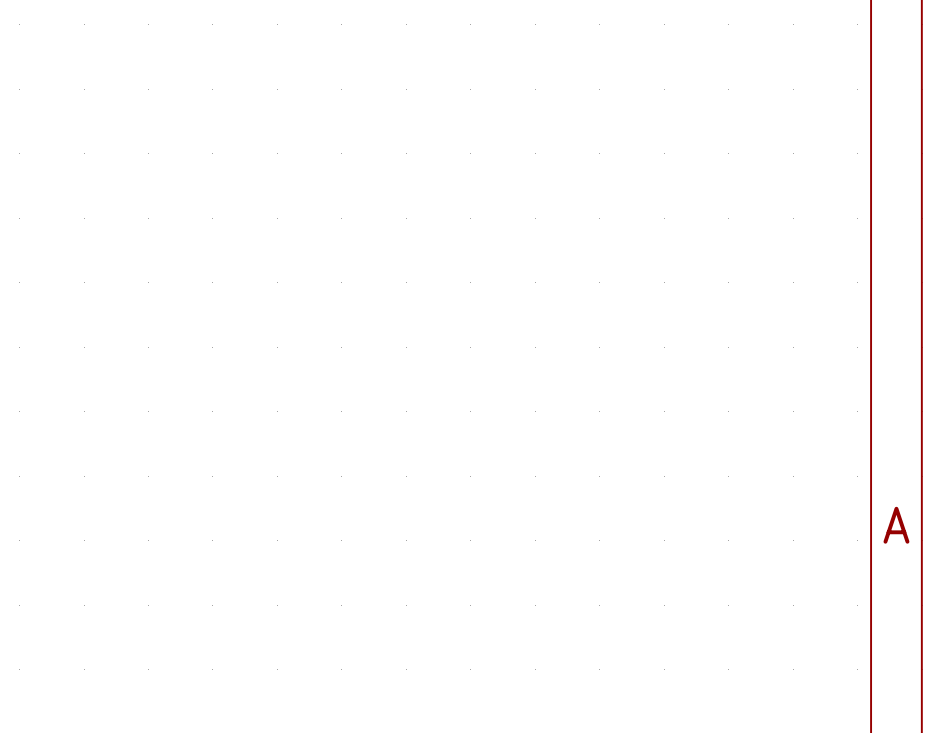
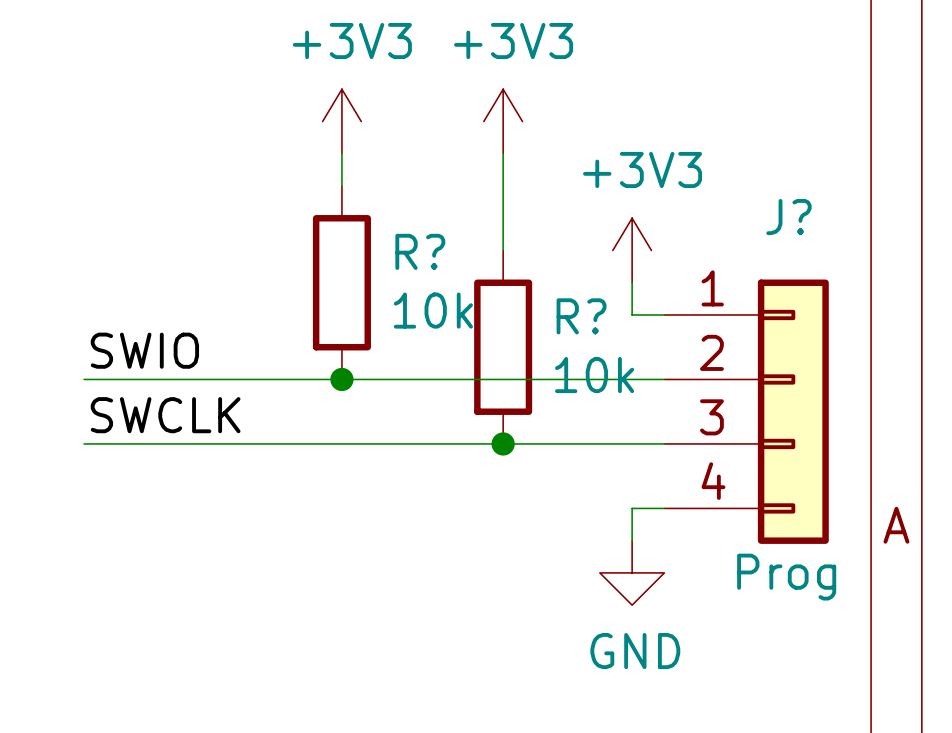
power symbol: none -> +3V3 (341, 121)
power symbol: none -> +3V3 (503, 121)
wire: none -> (341, 153) (341, 186)
wire: none -> (503, 153) (503, 250)
power symbol: none -> +3V3 (632, 250)
R?: none -> 10k (341, 282)
wire: none -> (632, 282) (632, 314) (664, 314)
R?: none -> 10k (503, 347)
label: none -> SWIO (144, 350)
wire: none -> (84, 379) (664, 379)
junction: none -> (341, 379)
J?: none -> Prog (746, 411)
label: none -> SWCLK (165, 415)
wire: none -> (84, 443) (664, 443)
junction: none -> (503, 443)
wire: none -> (664, 508) (632, 508) (632, 540)
power symbol: none -> GND (632, 572)

